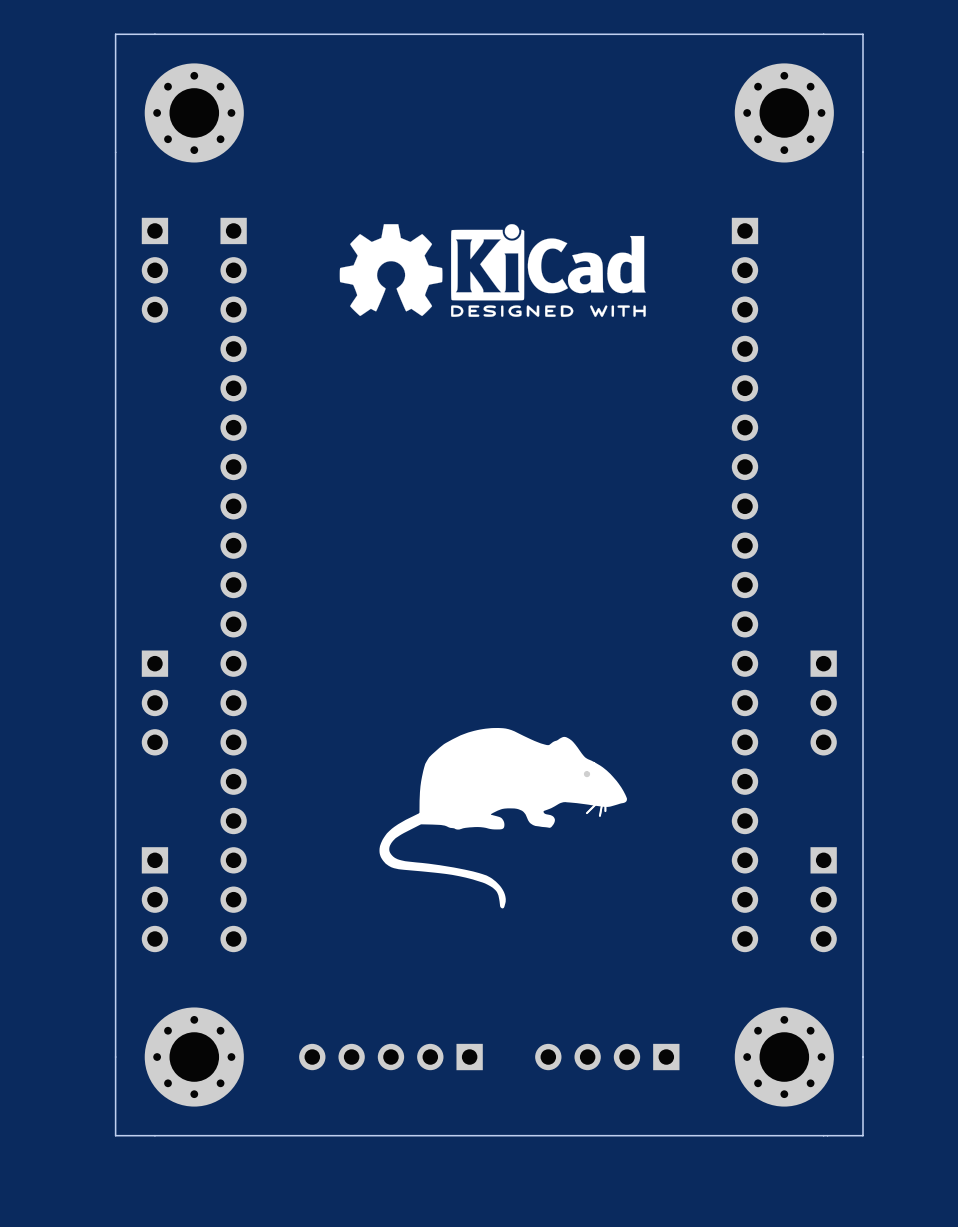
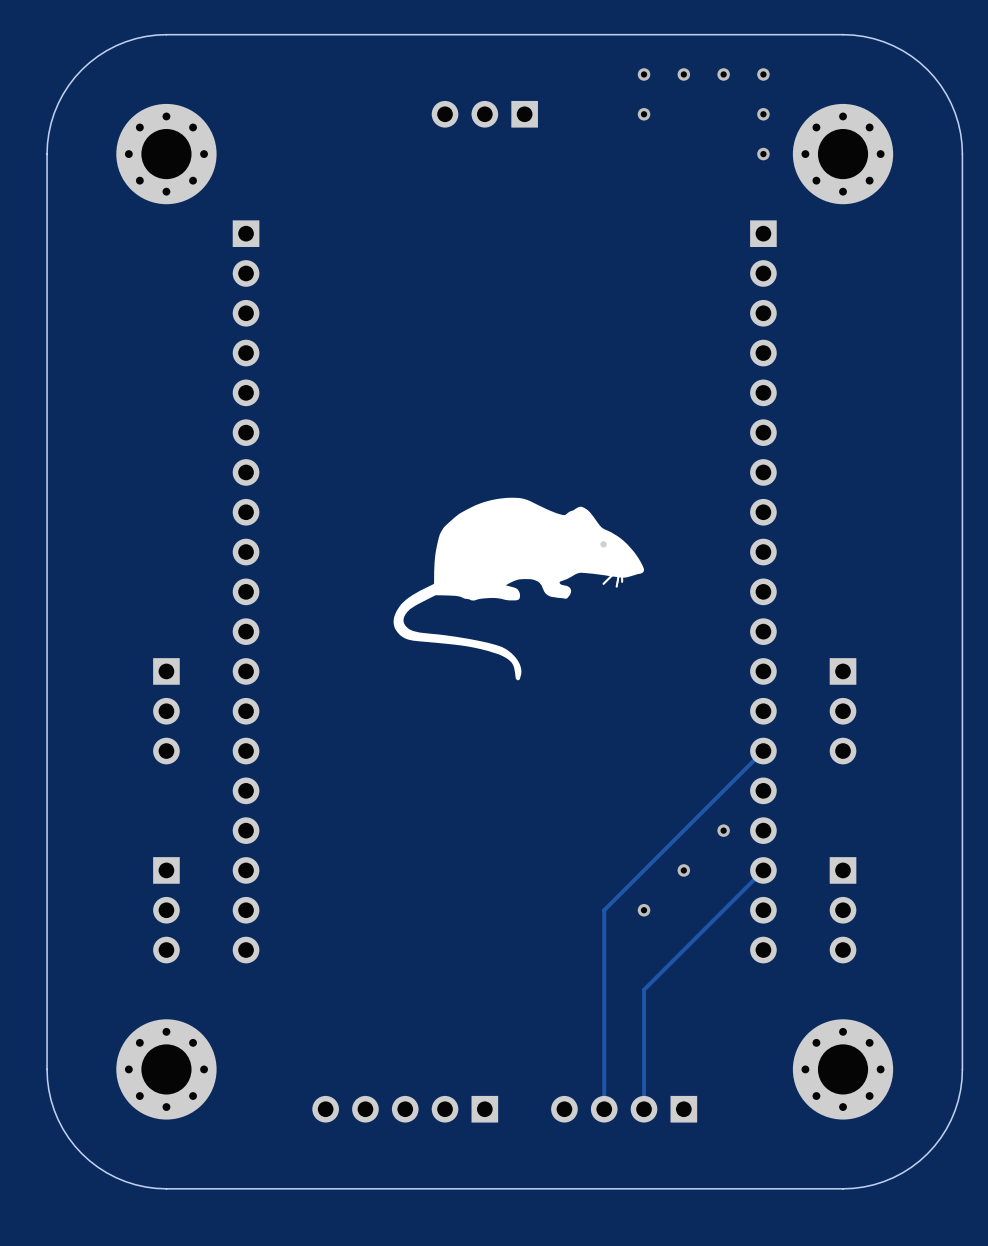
board edge: (823, 34) (863, 34) (863, 1135) (115, 1135) (115, 34) (154, 34) -> (843, 34) (863, 36) (883, 41) (911, 56) (927, 69) (940, 85) (951, 103) (958, 123) (961, 143) (962, 1069) (958, 1100) (946, 1129) (927, 1153) (902, 1172) (883, 1181) (853, 1188) (166, 1188) (145, 1187) (125, 1181) (106, 1172) (82, 1153) (63, 1129) (54, 1110) (48, 1090) (47, 1069) (47, 143) (51, 123) (58, 103) (68, 85) (89, 62) (106, 50) (125, 41) (145, 36) (166, 34)
via: none -> (644, 74)
via: none -> (683, 74)
via: none -> (723, 74)
via: none -> (763, 74)
part position: (194, 112) -> (166, 154)
via: none -> (644, 114)
via: none -> (763, 114)
part position: (784, 112) -> (843, 154)
via: none -> (763, 154)
drawing: [339, 224, 646, 317] -> none
part rotation: 0° (154, 270) -> 90° clockwise (484, 114)
part position: (154, 270) -> (484, 114)
track: none -> (763, 751) (604, 910) (604, 1109)
part position: (503, 818) -> (518, 589)
via: none -> (723, 830)
via: none -> (683, 870)
track: none -> (763, 870) (644, 989) (644, 1109)
via: none -> (644, 910)
part position: (194, 1057) -> (166, 1069)
part position: (390, 1057) -> (405, 1109)
part position: (607, 1057) -> (624, 1109)
part position: (784, 1057) -> (843, 1069)

